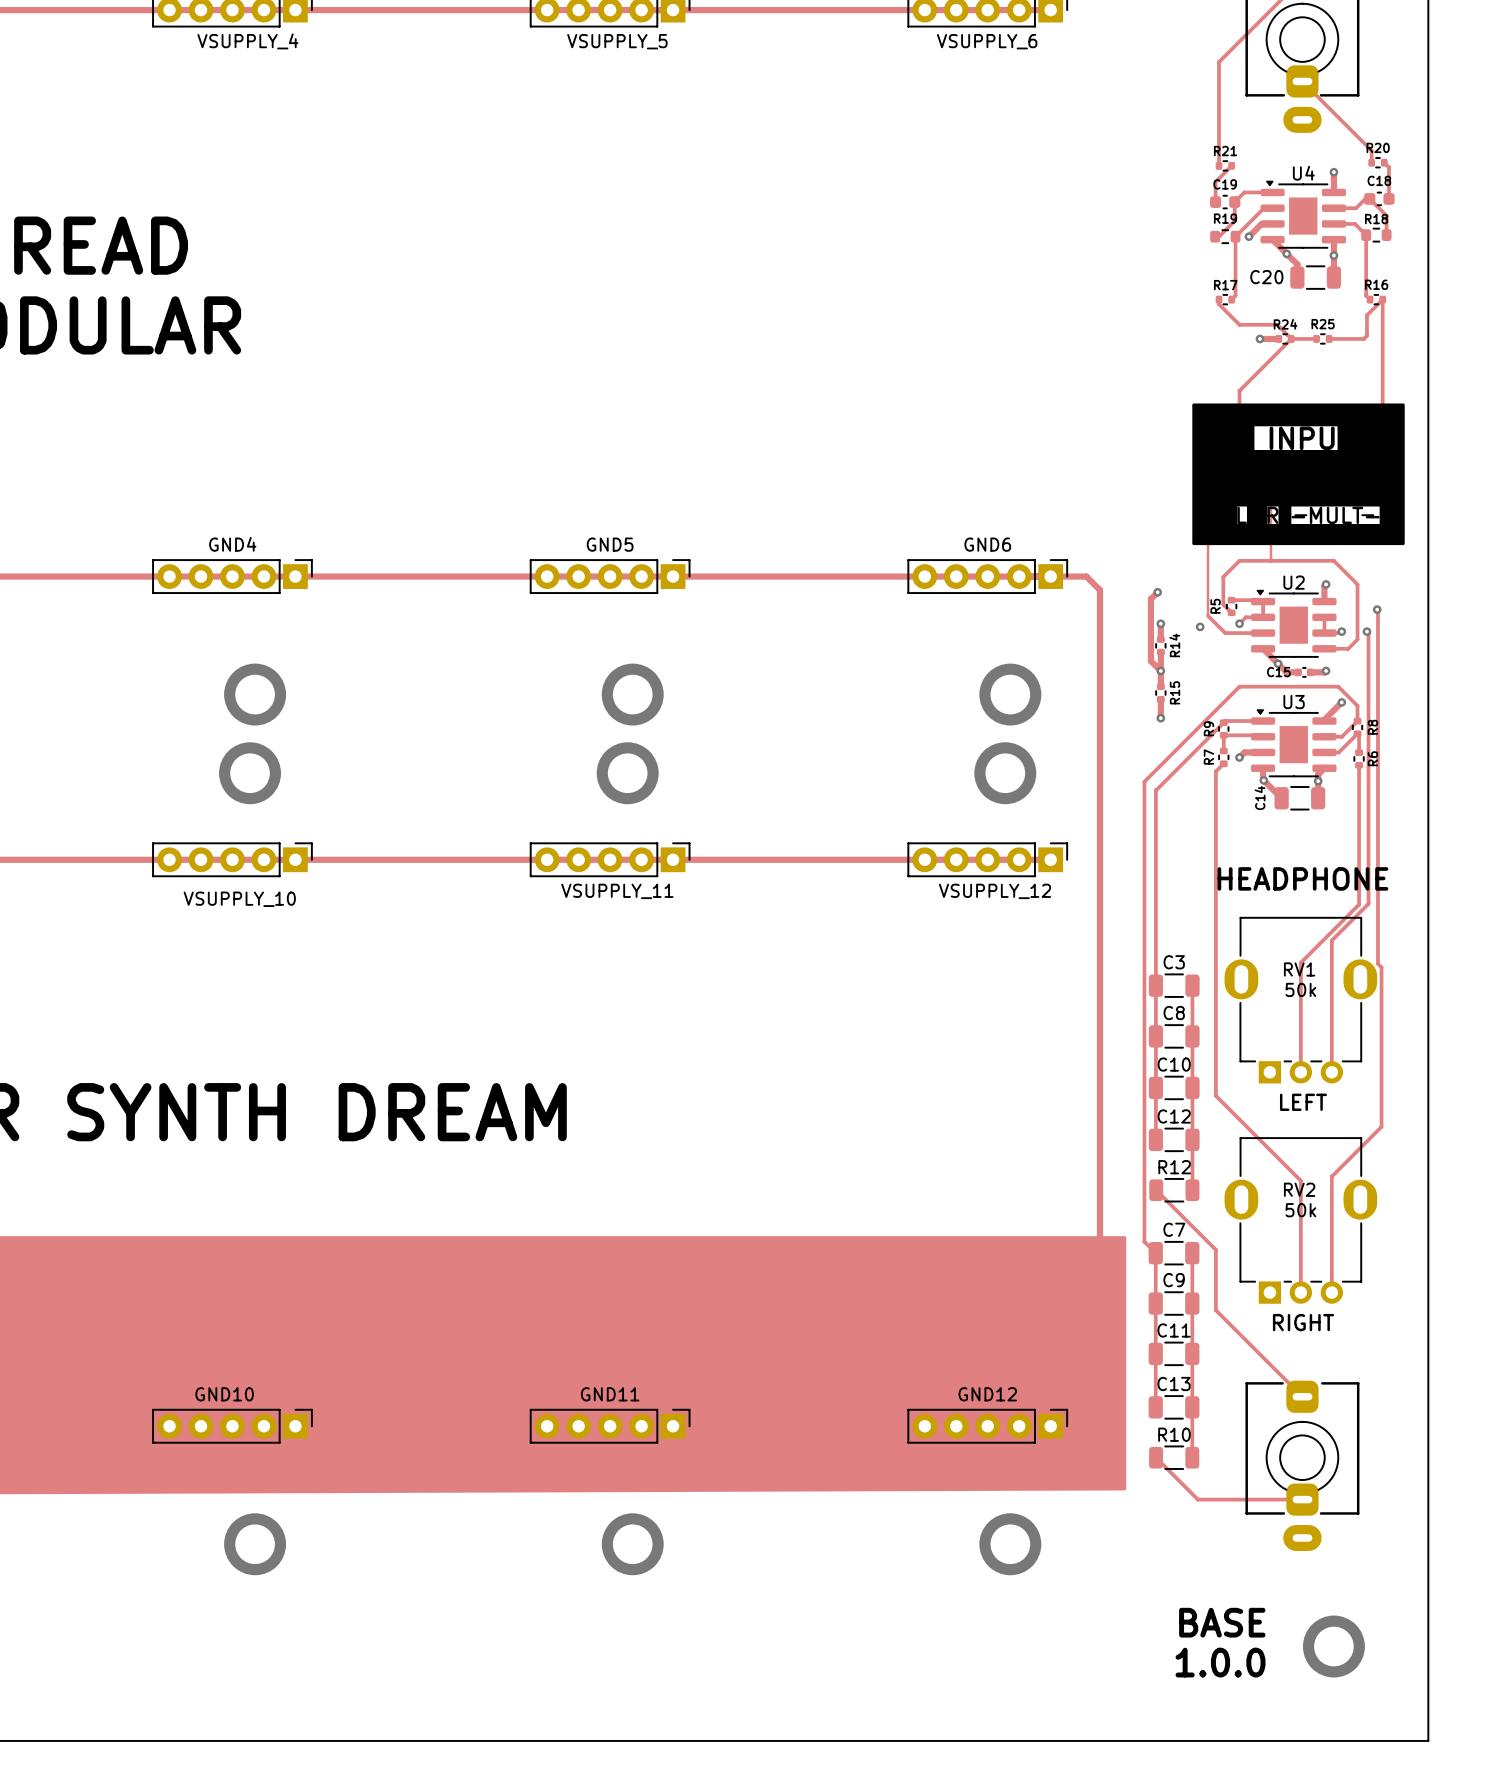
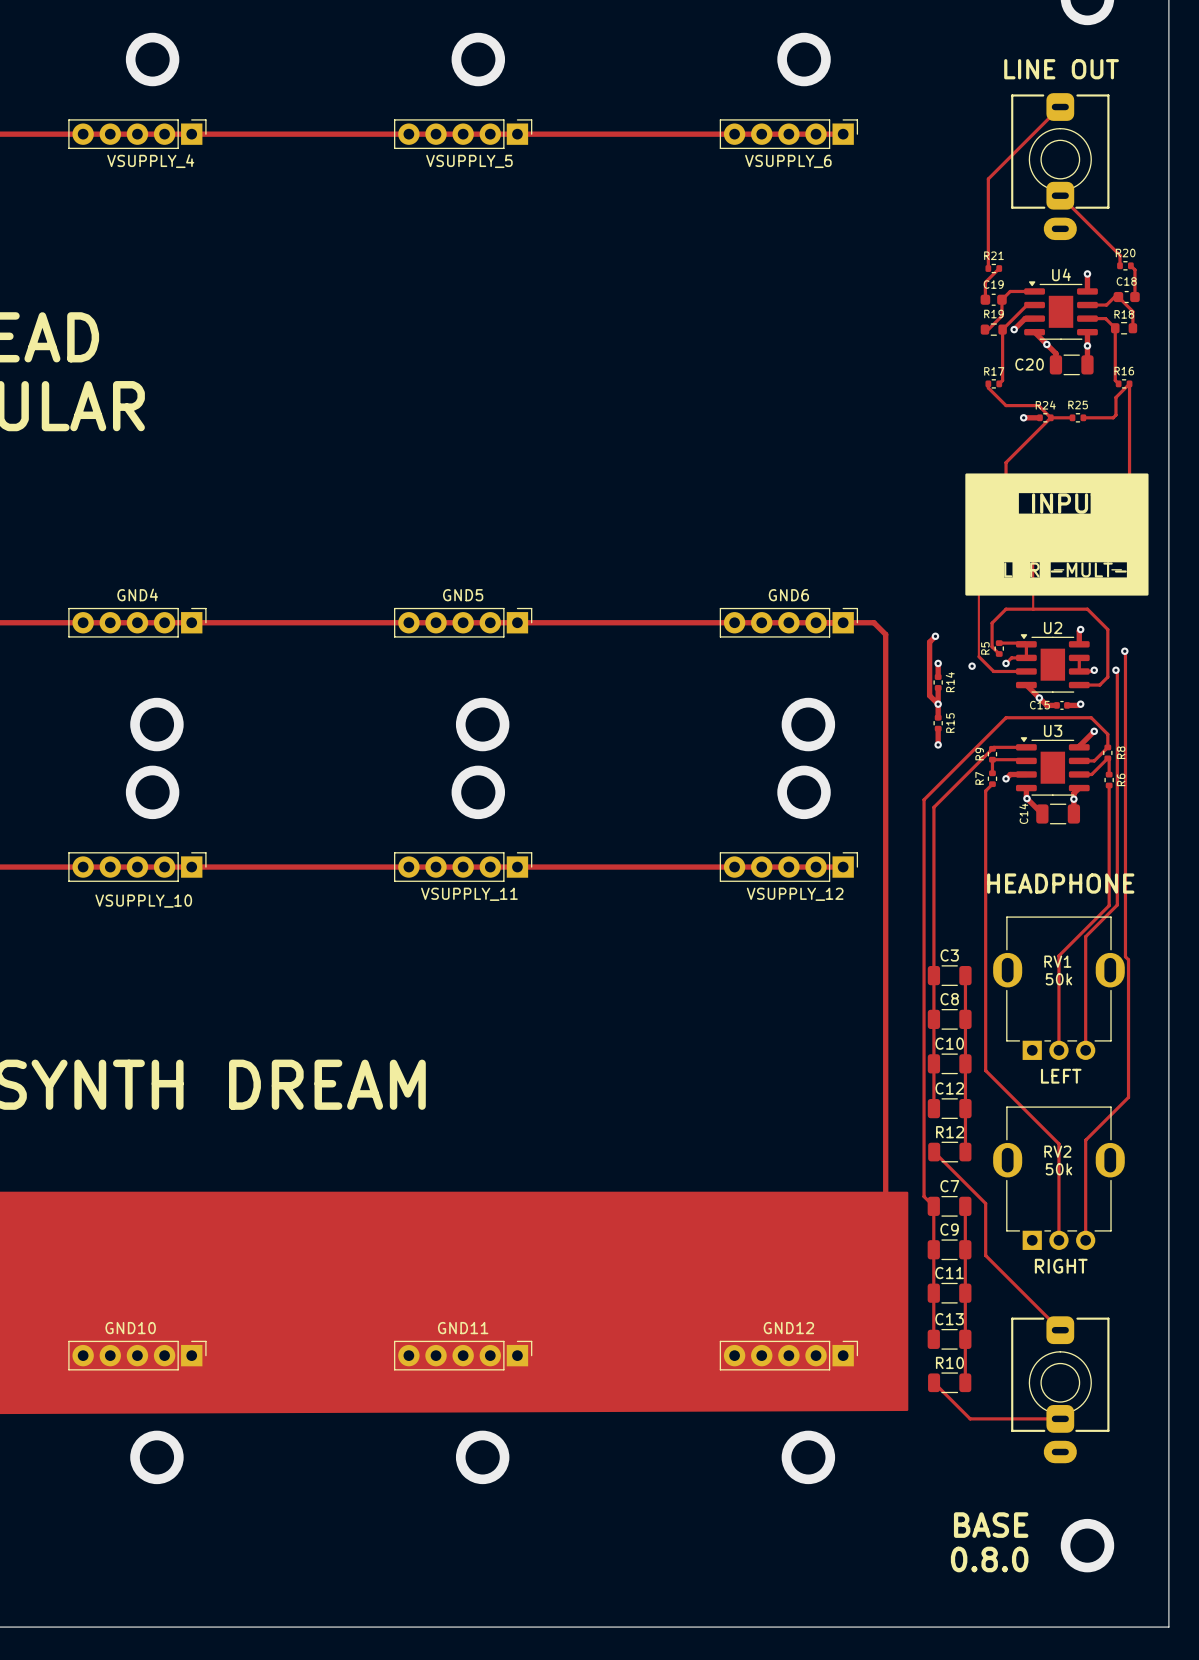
text: 1.0.0 (1220, 1662) -> 0.8.0 (989, 1559)

